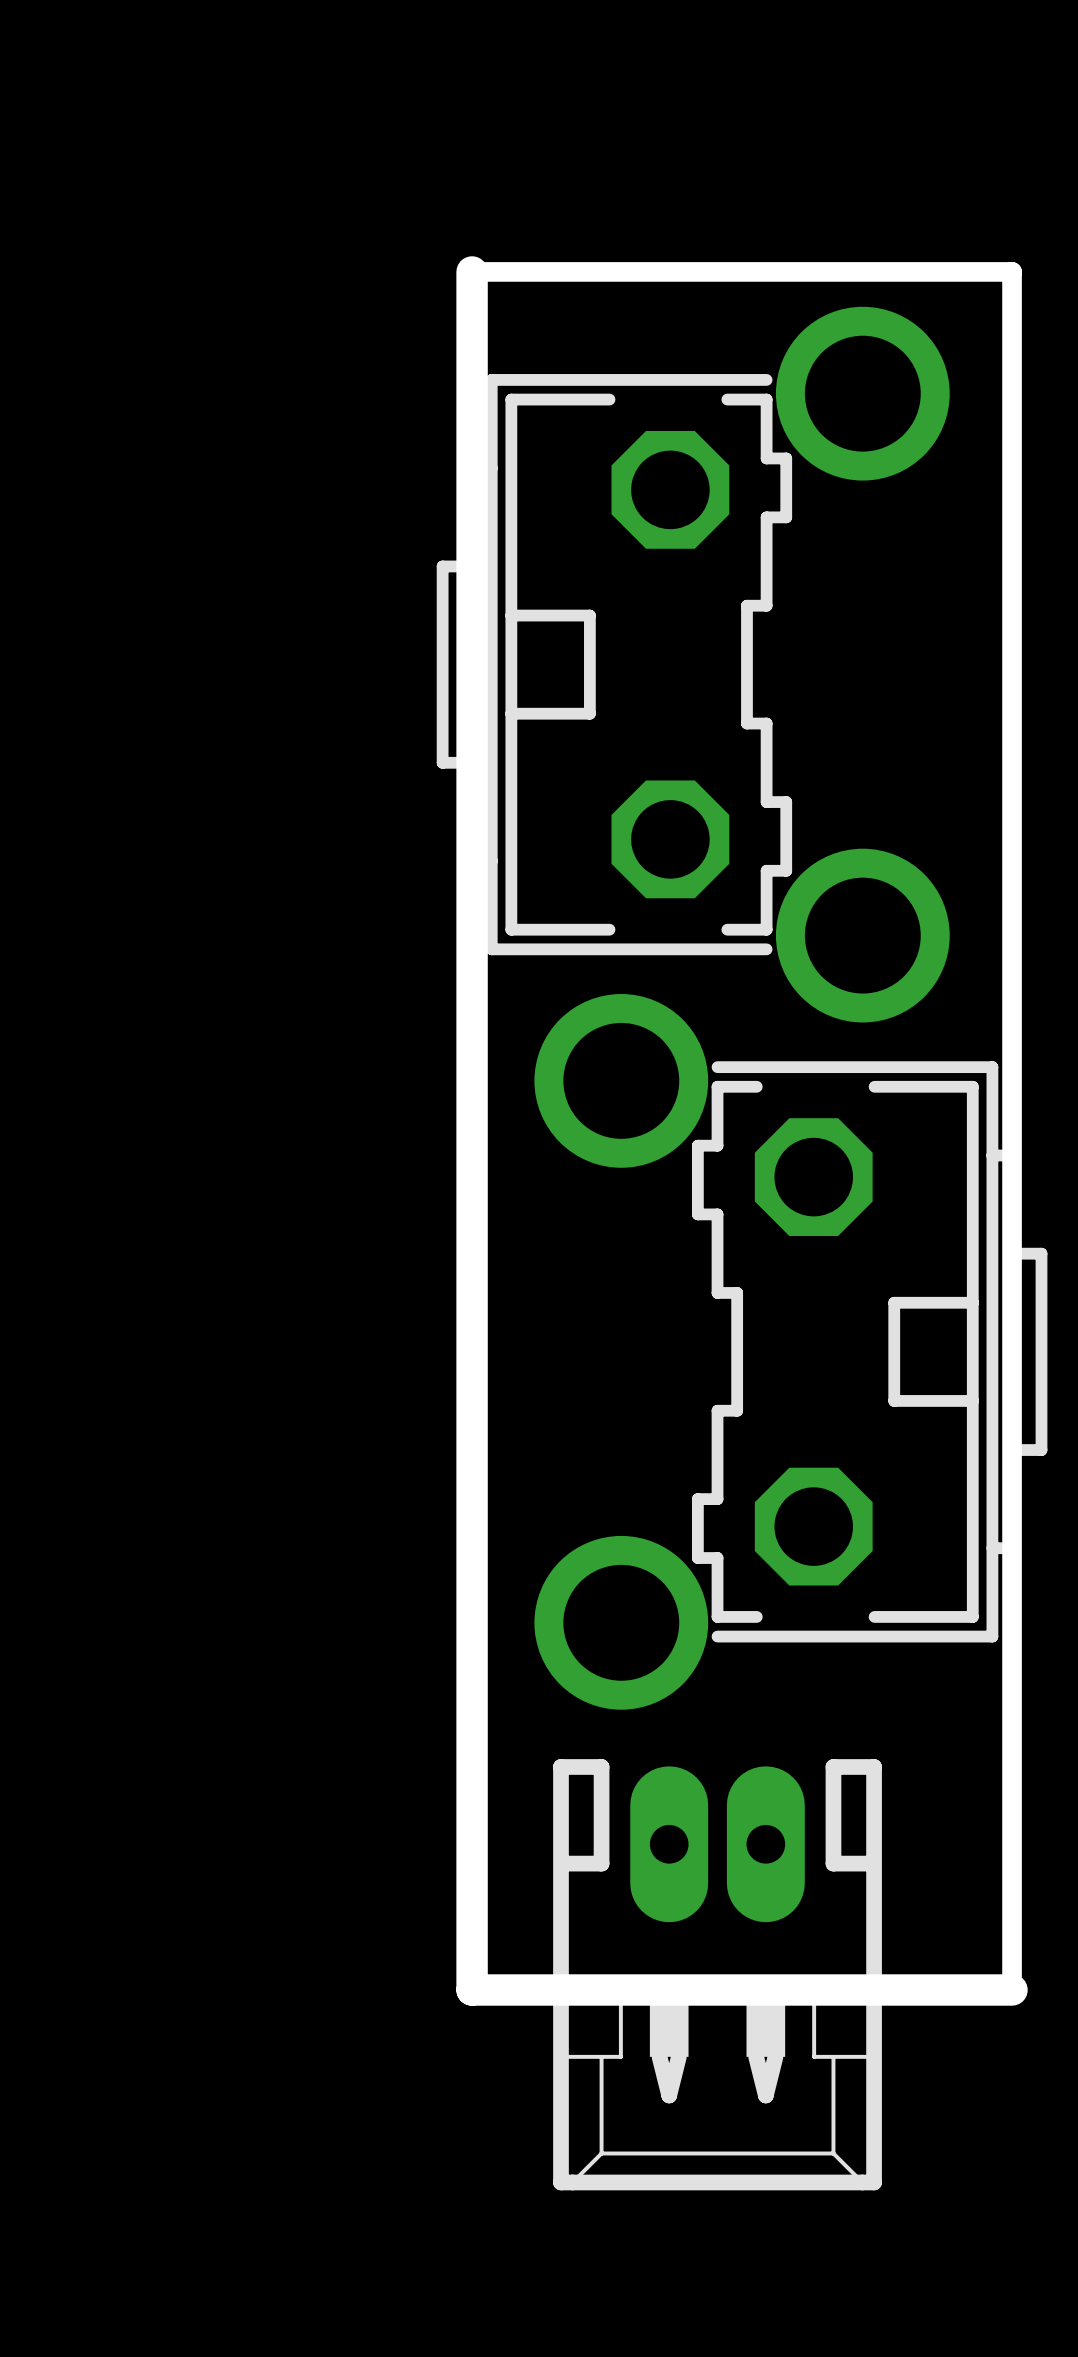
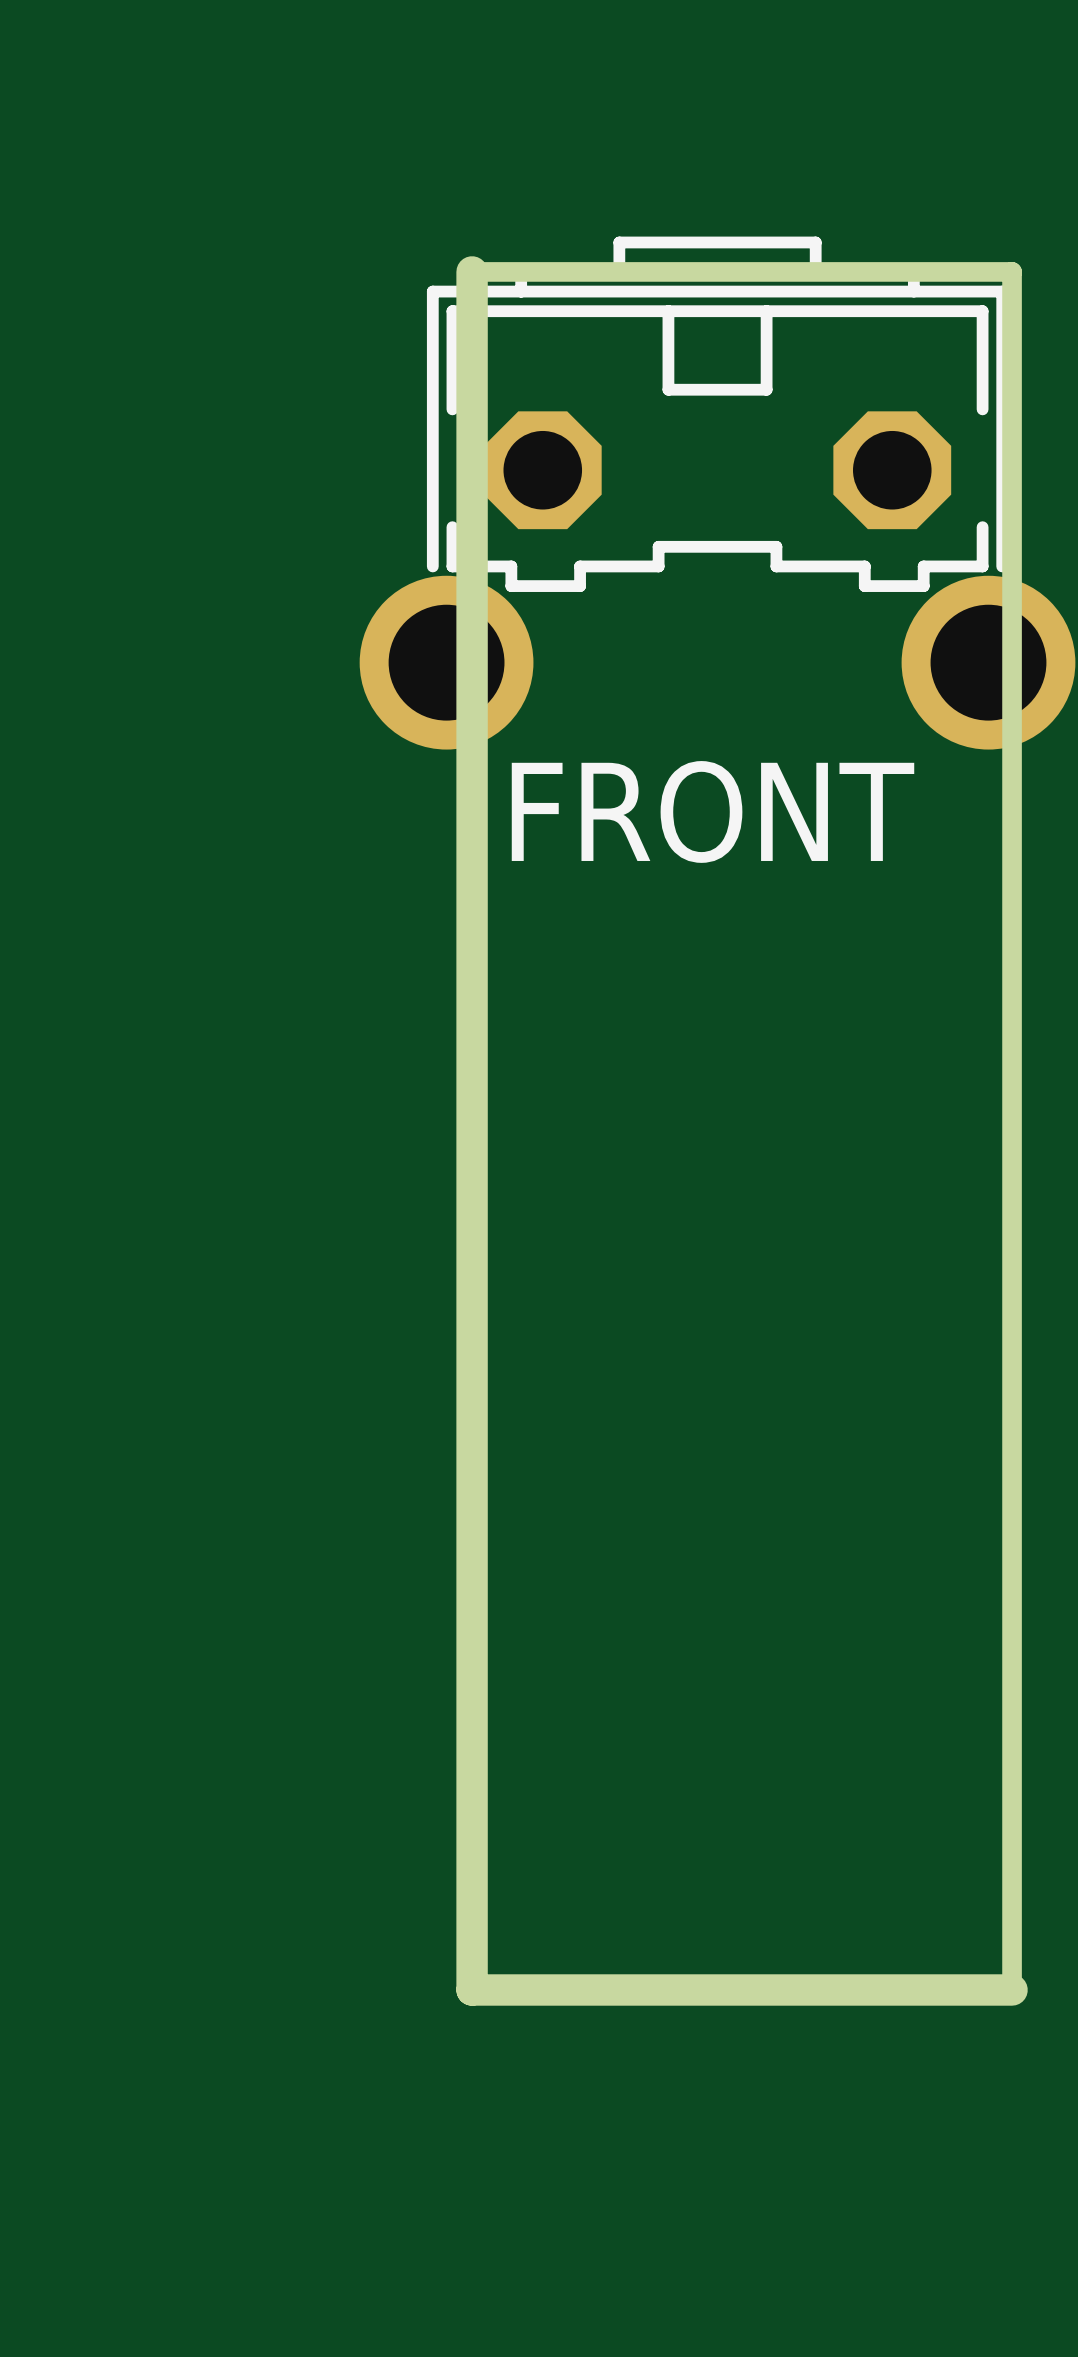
FRONT: none -> (717, 493)
part: (693, 664) -> none
part: (790, 1351) -> none
part: (717, 1974) -> none

